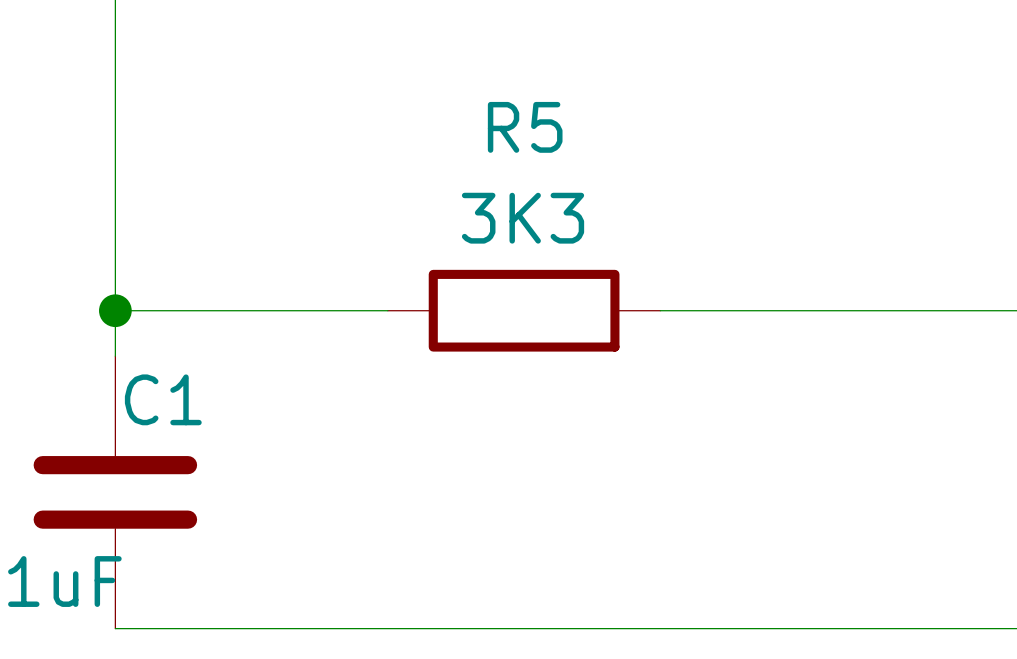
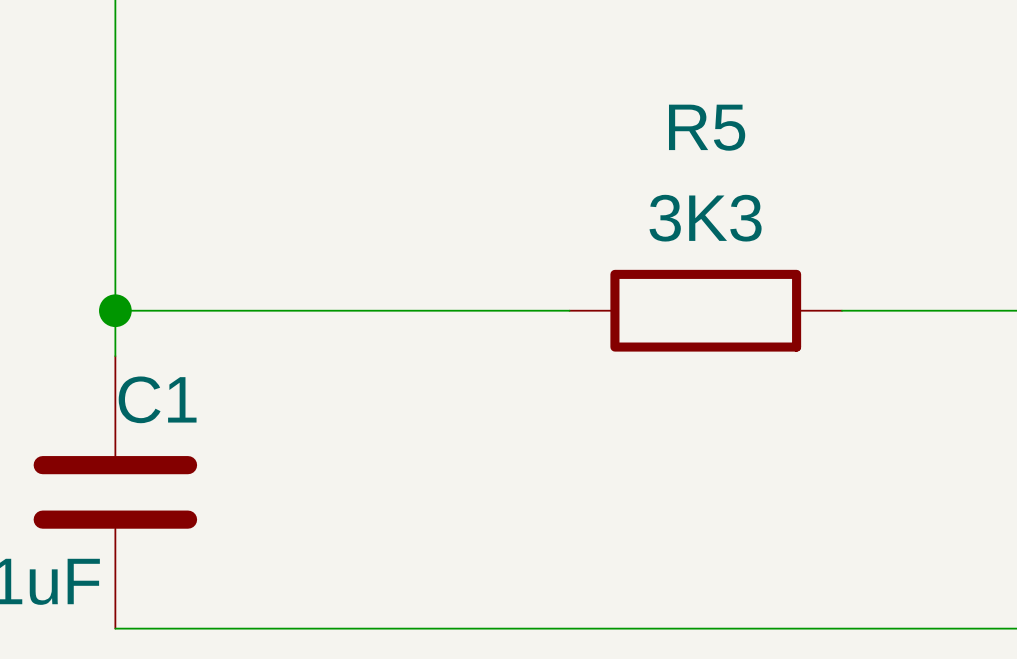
R5 position: (524, 310) -> (705, 310)
wire: (660, 310) (842, 310) -> (387, 310) (569, 310)

